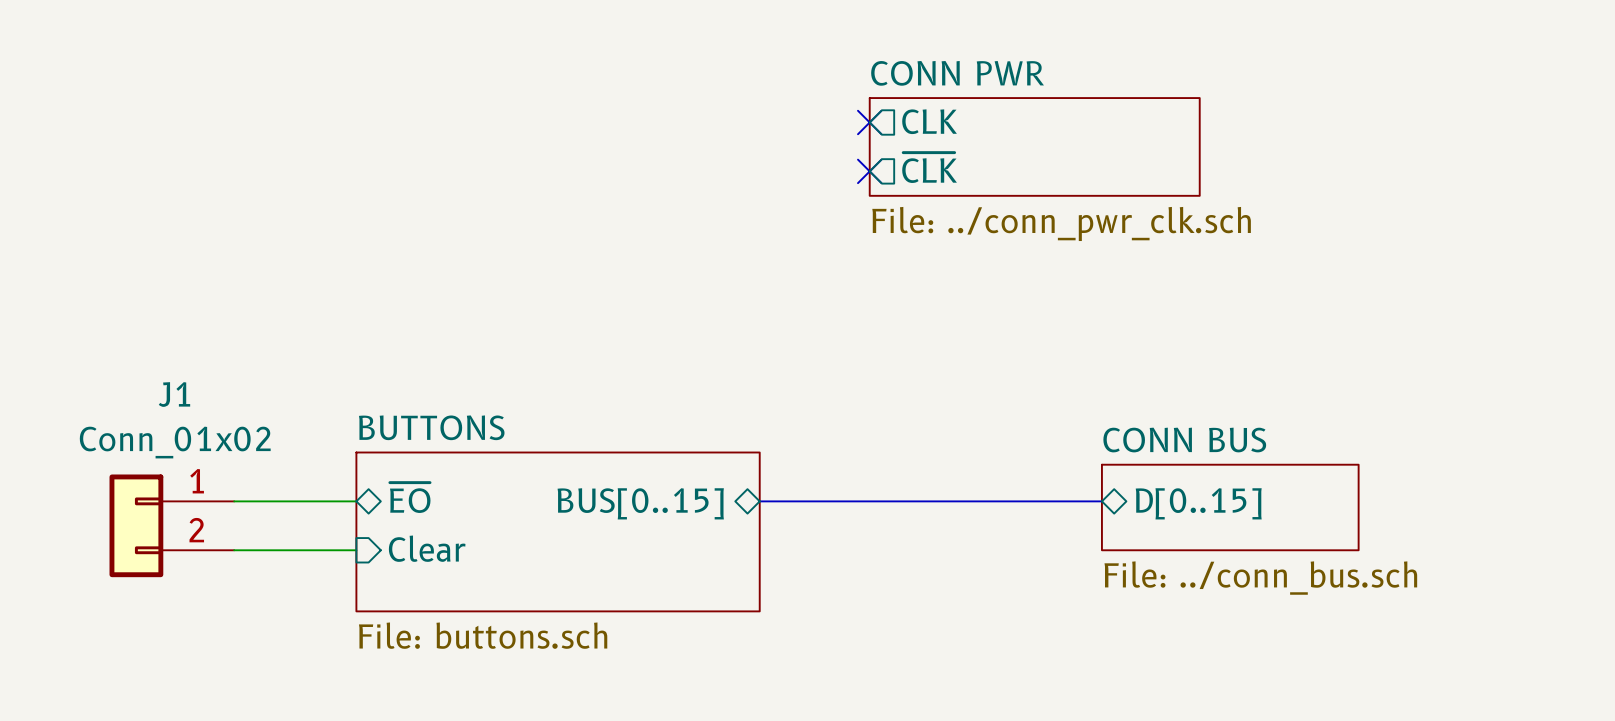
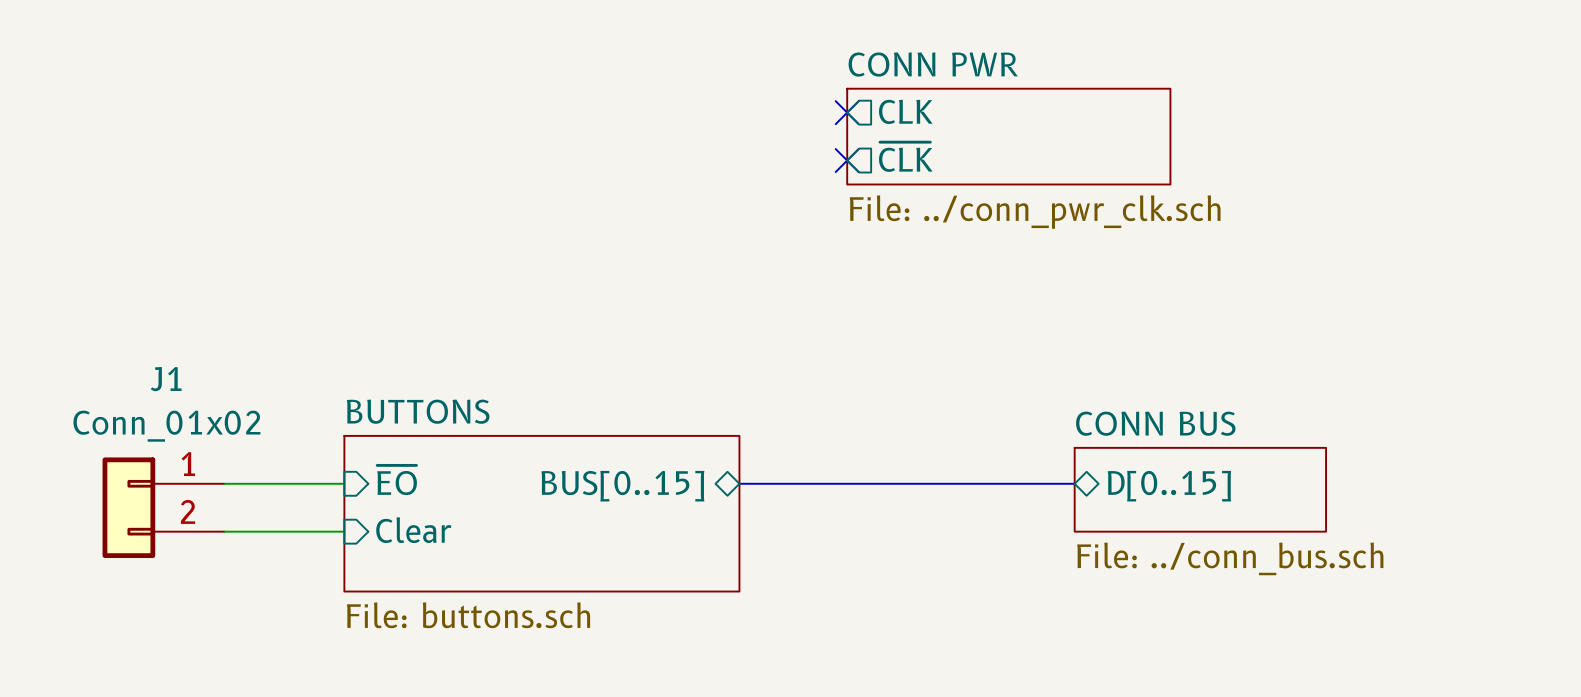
sheet pin shape: bidirectional (410, 497) -> input (397, 480)

